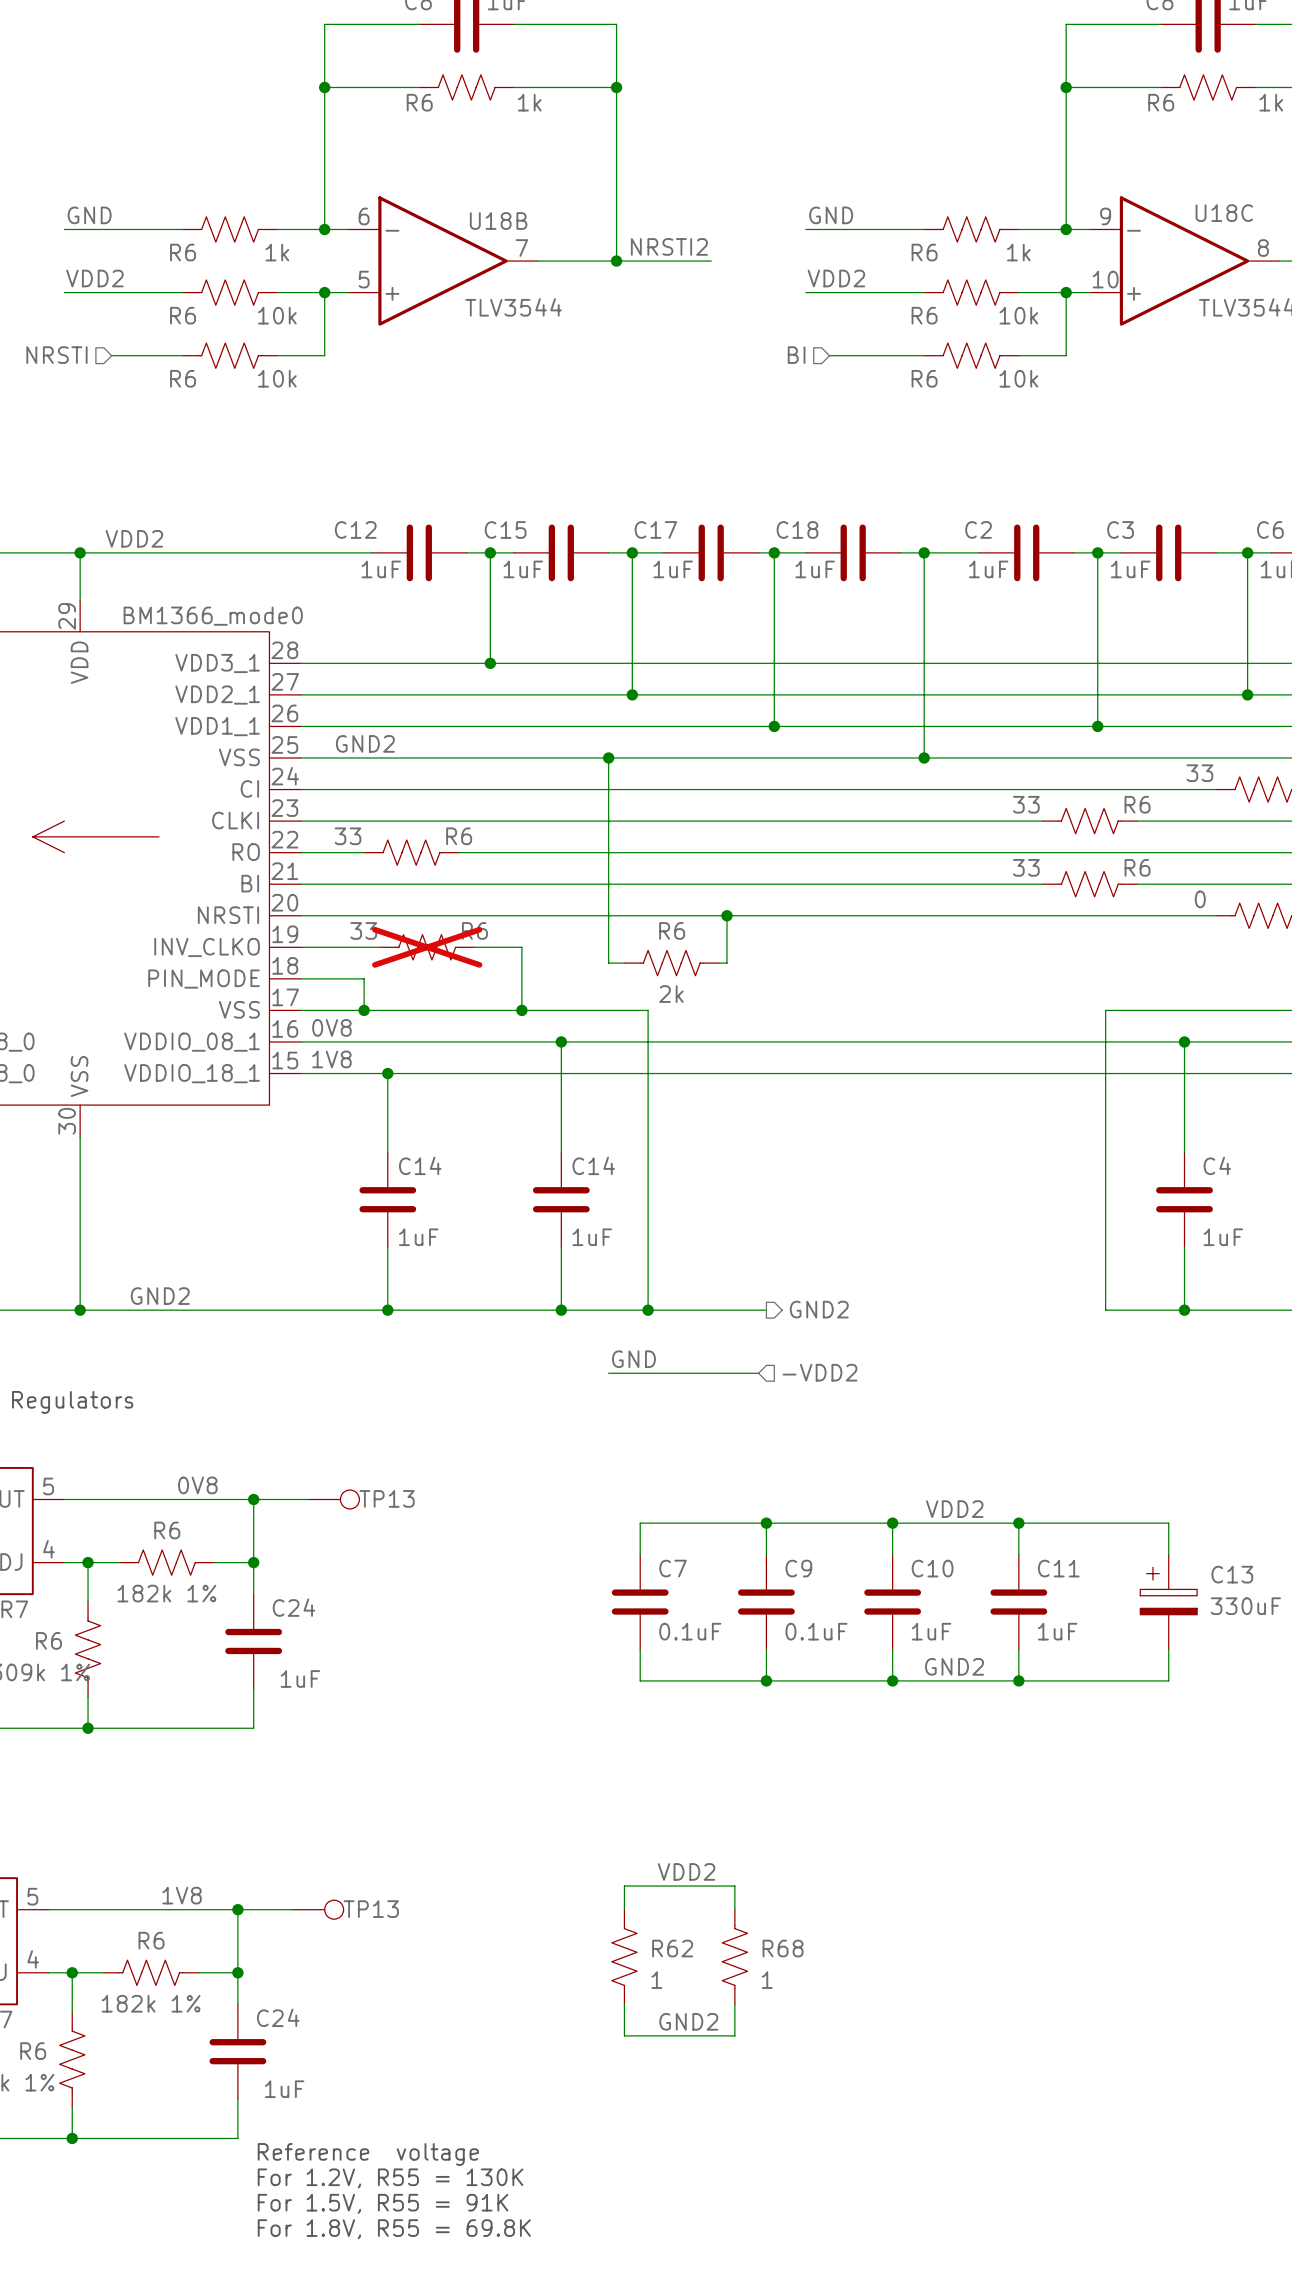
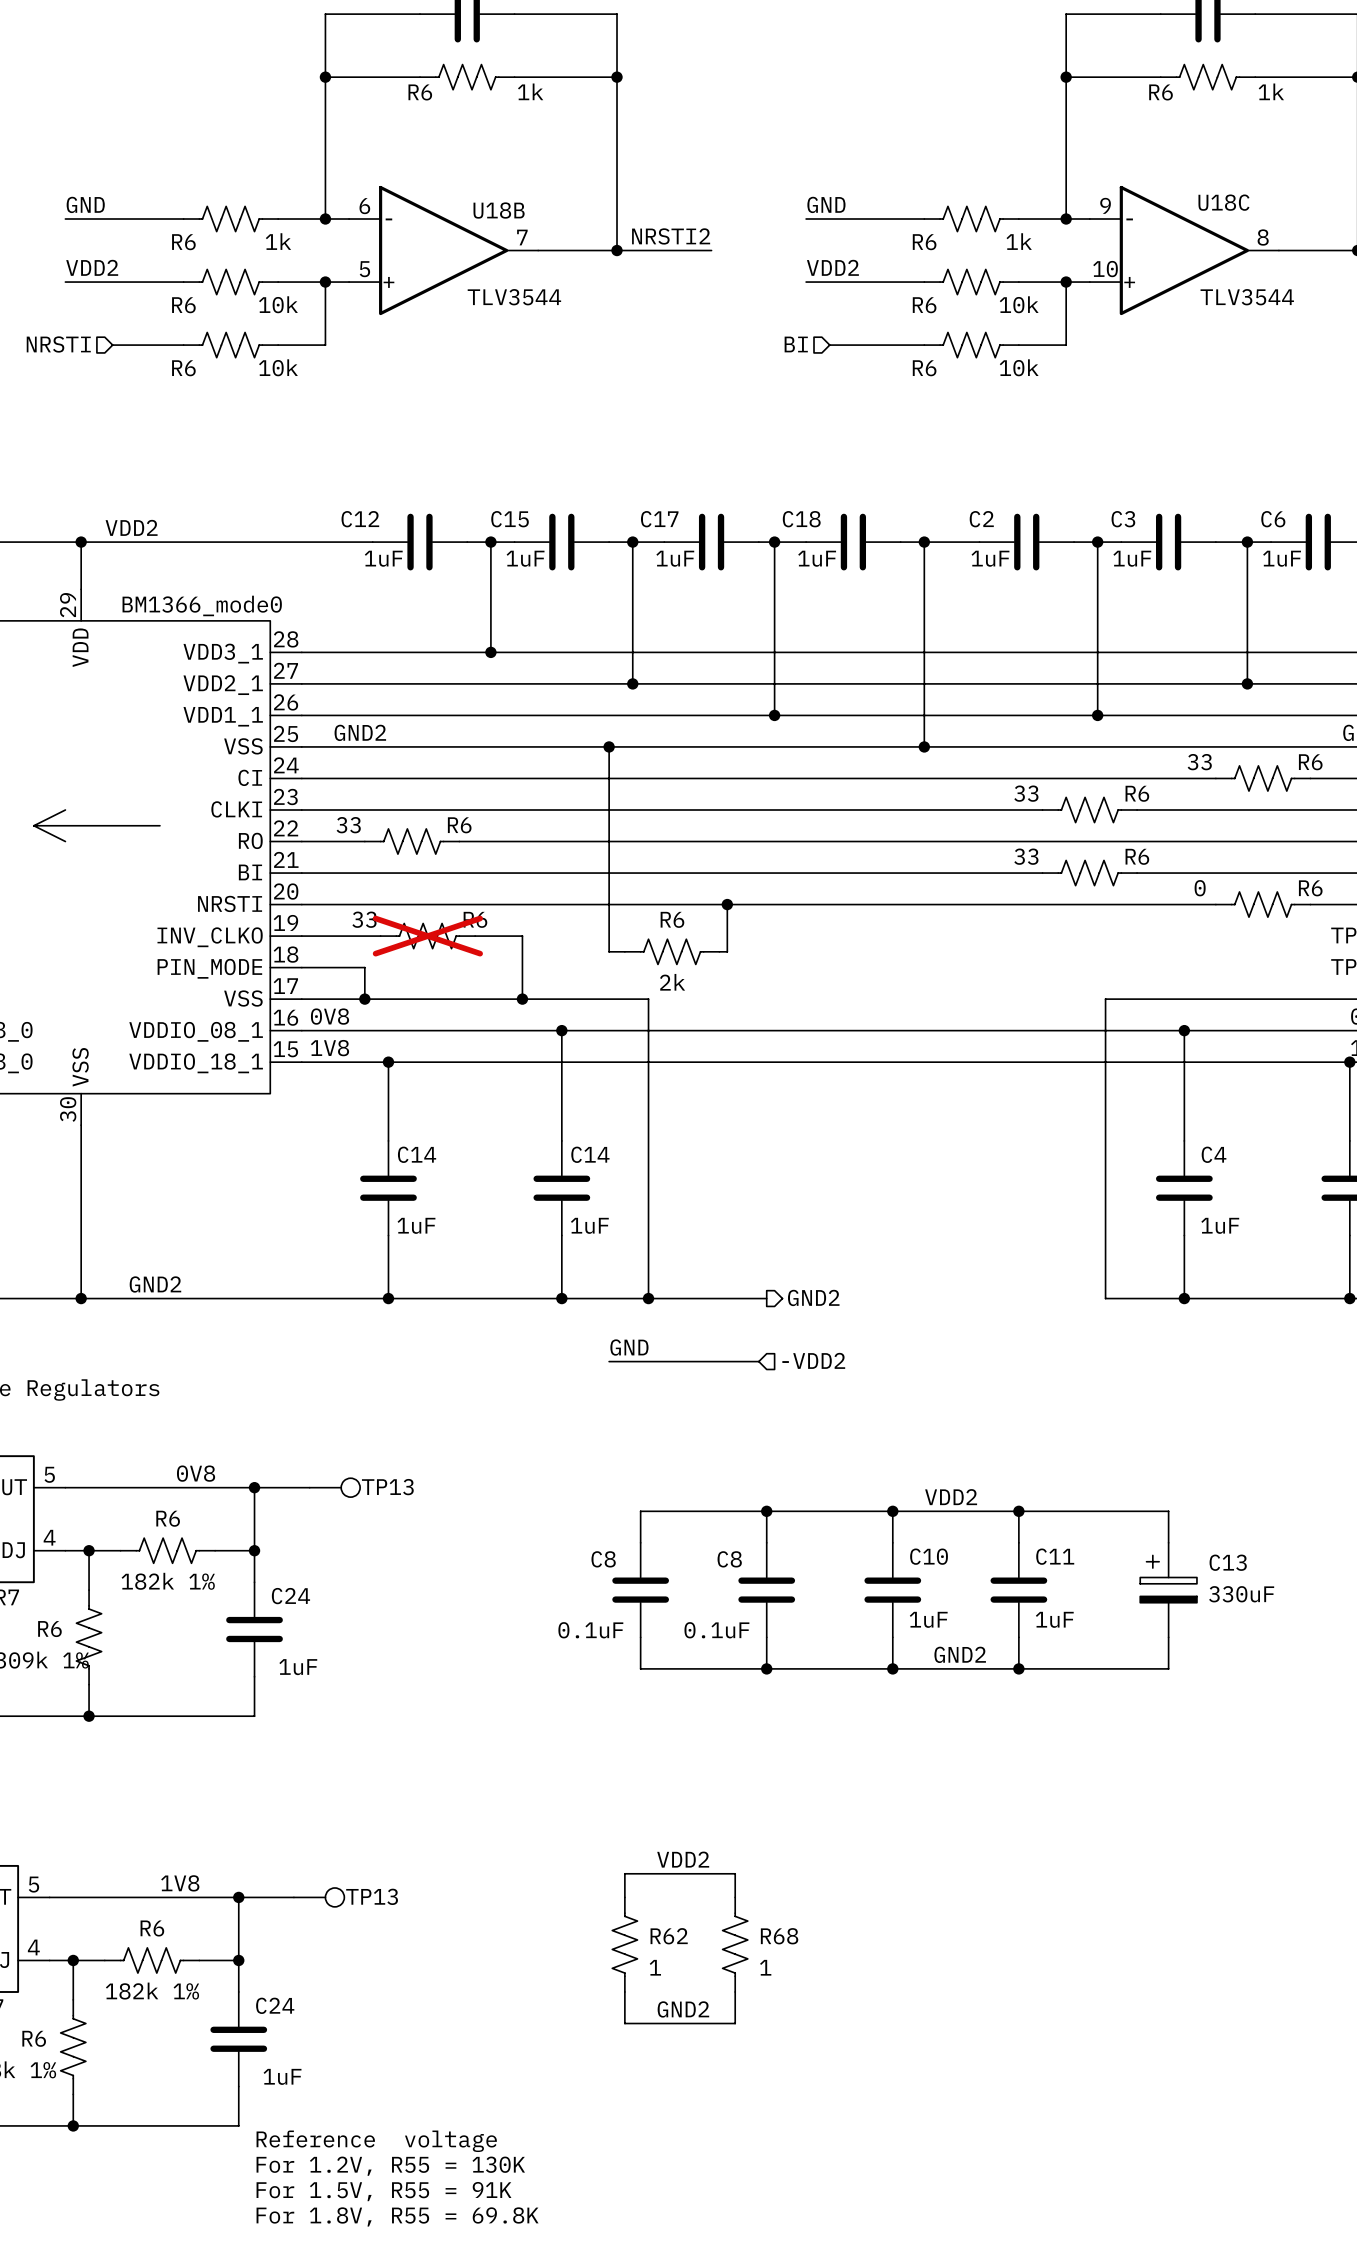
C7 name: C7 (673, 1568) -> C8 (603, 1559)
C9 name: C9 (798, 1568) -> C8 (729, 1559)
C7 value position: 0.1uF (690, 1631) -> 0.1uF (590, 1630)
C9 value position: 0.1uF (816, 1631) -> 0.1uF (716, 1630)

